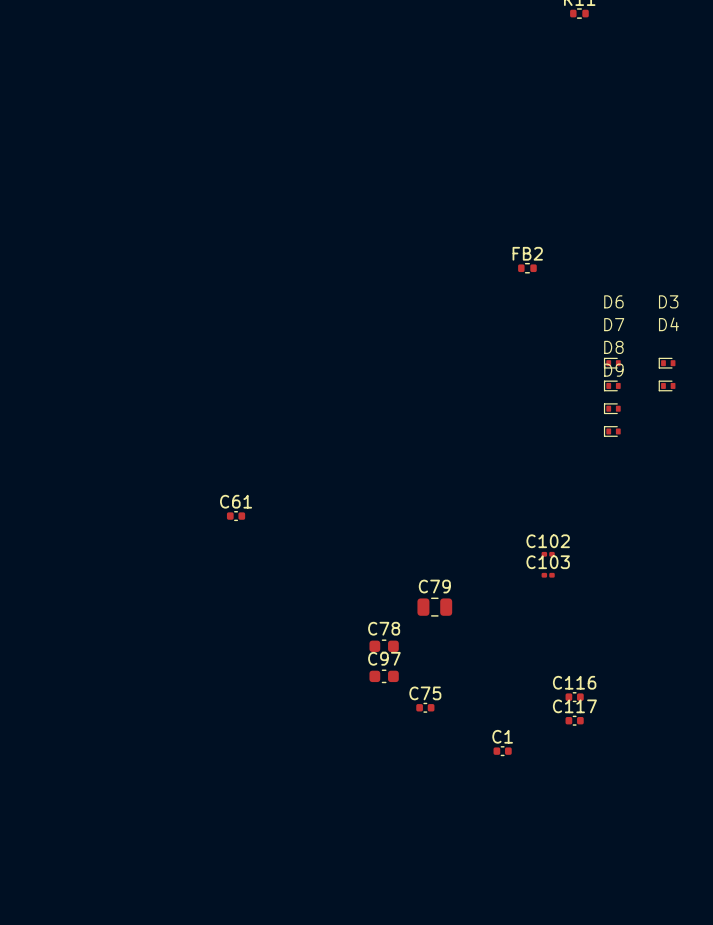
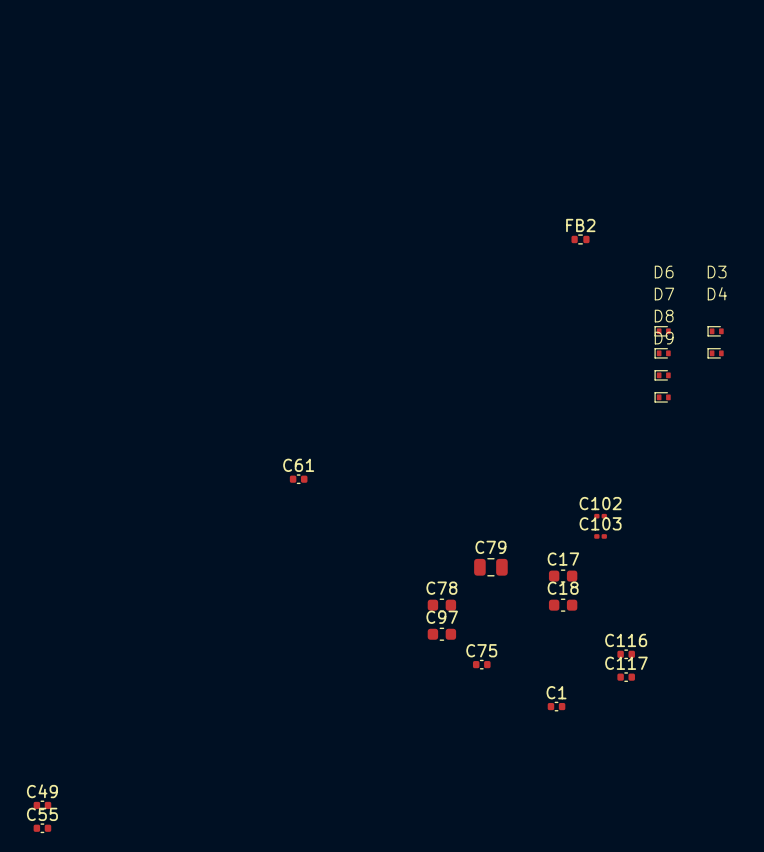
C17: none -> (563, 576)
C18: none -> (563, 605)

